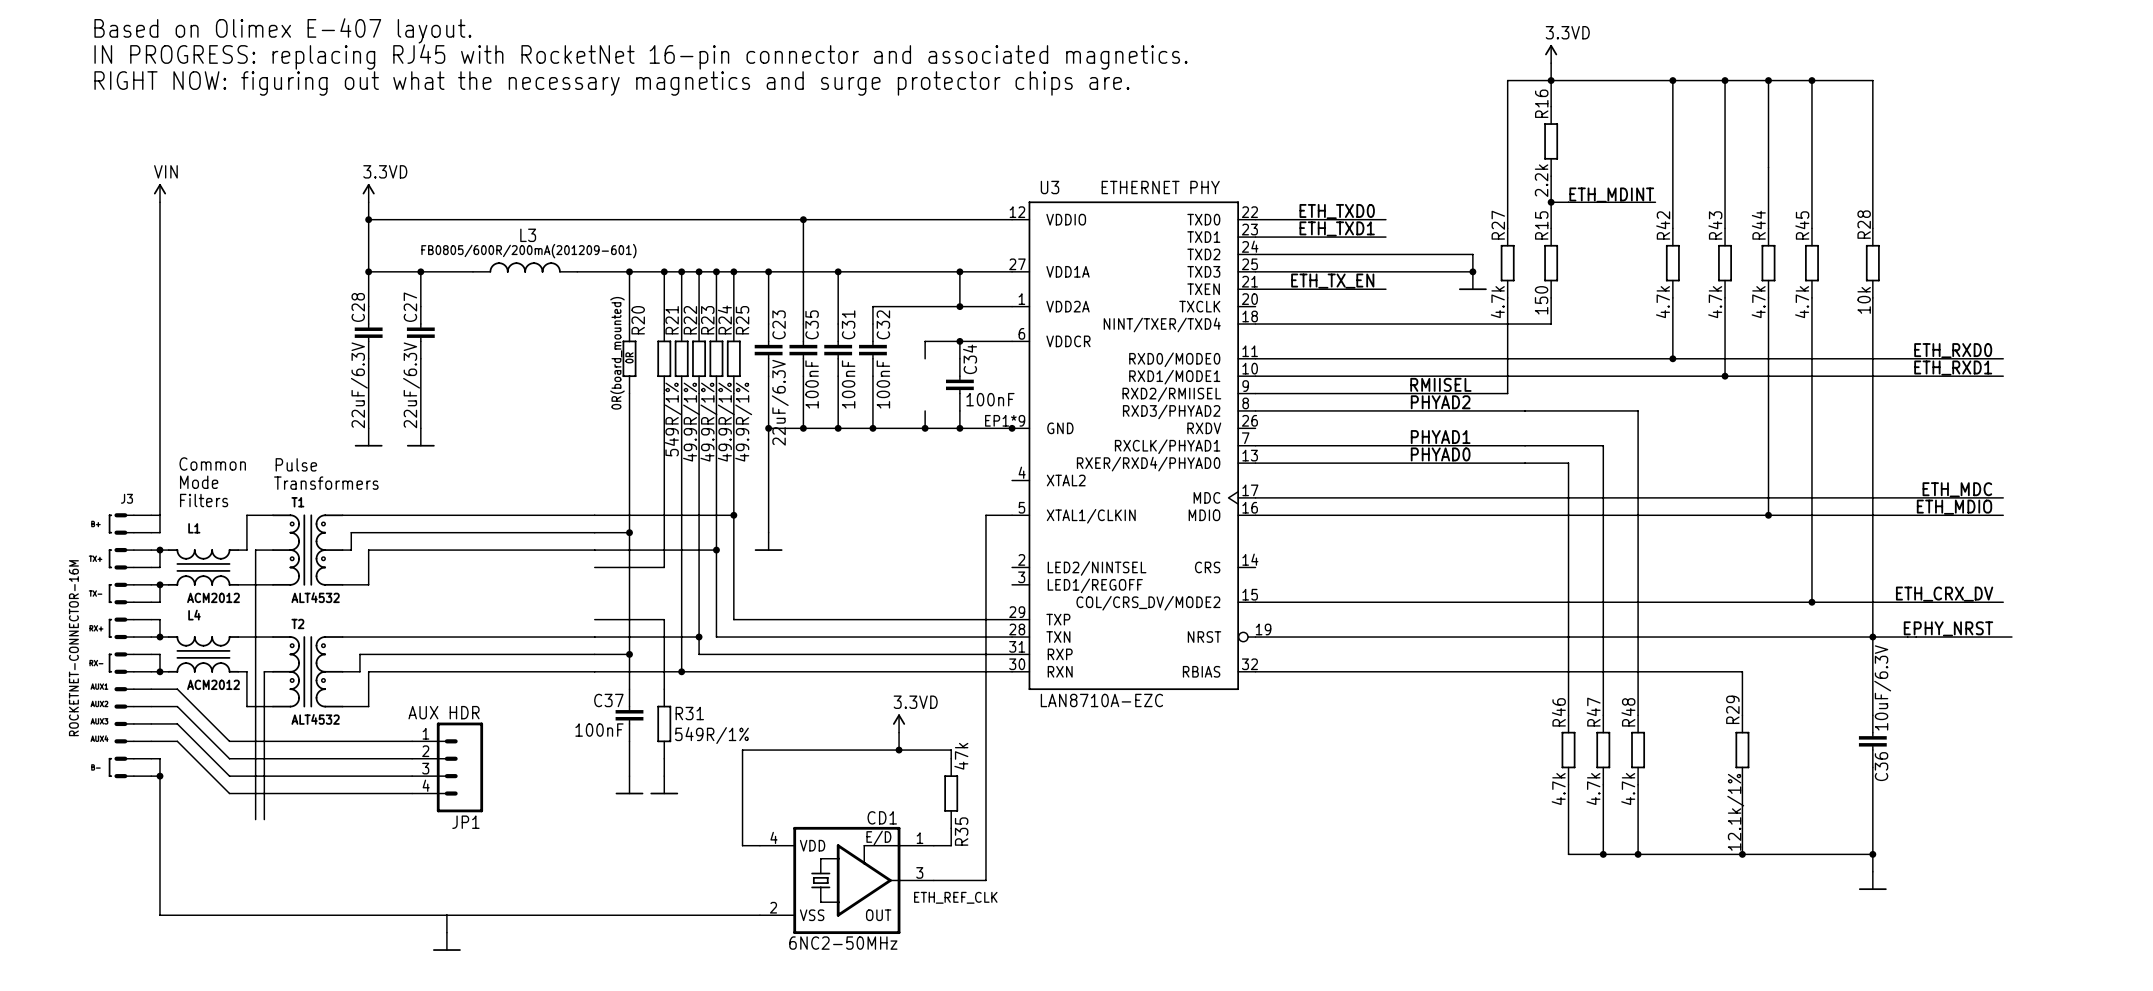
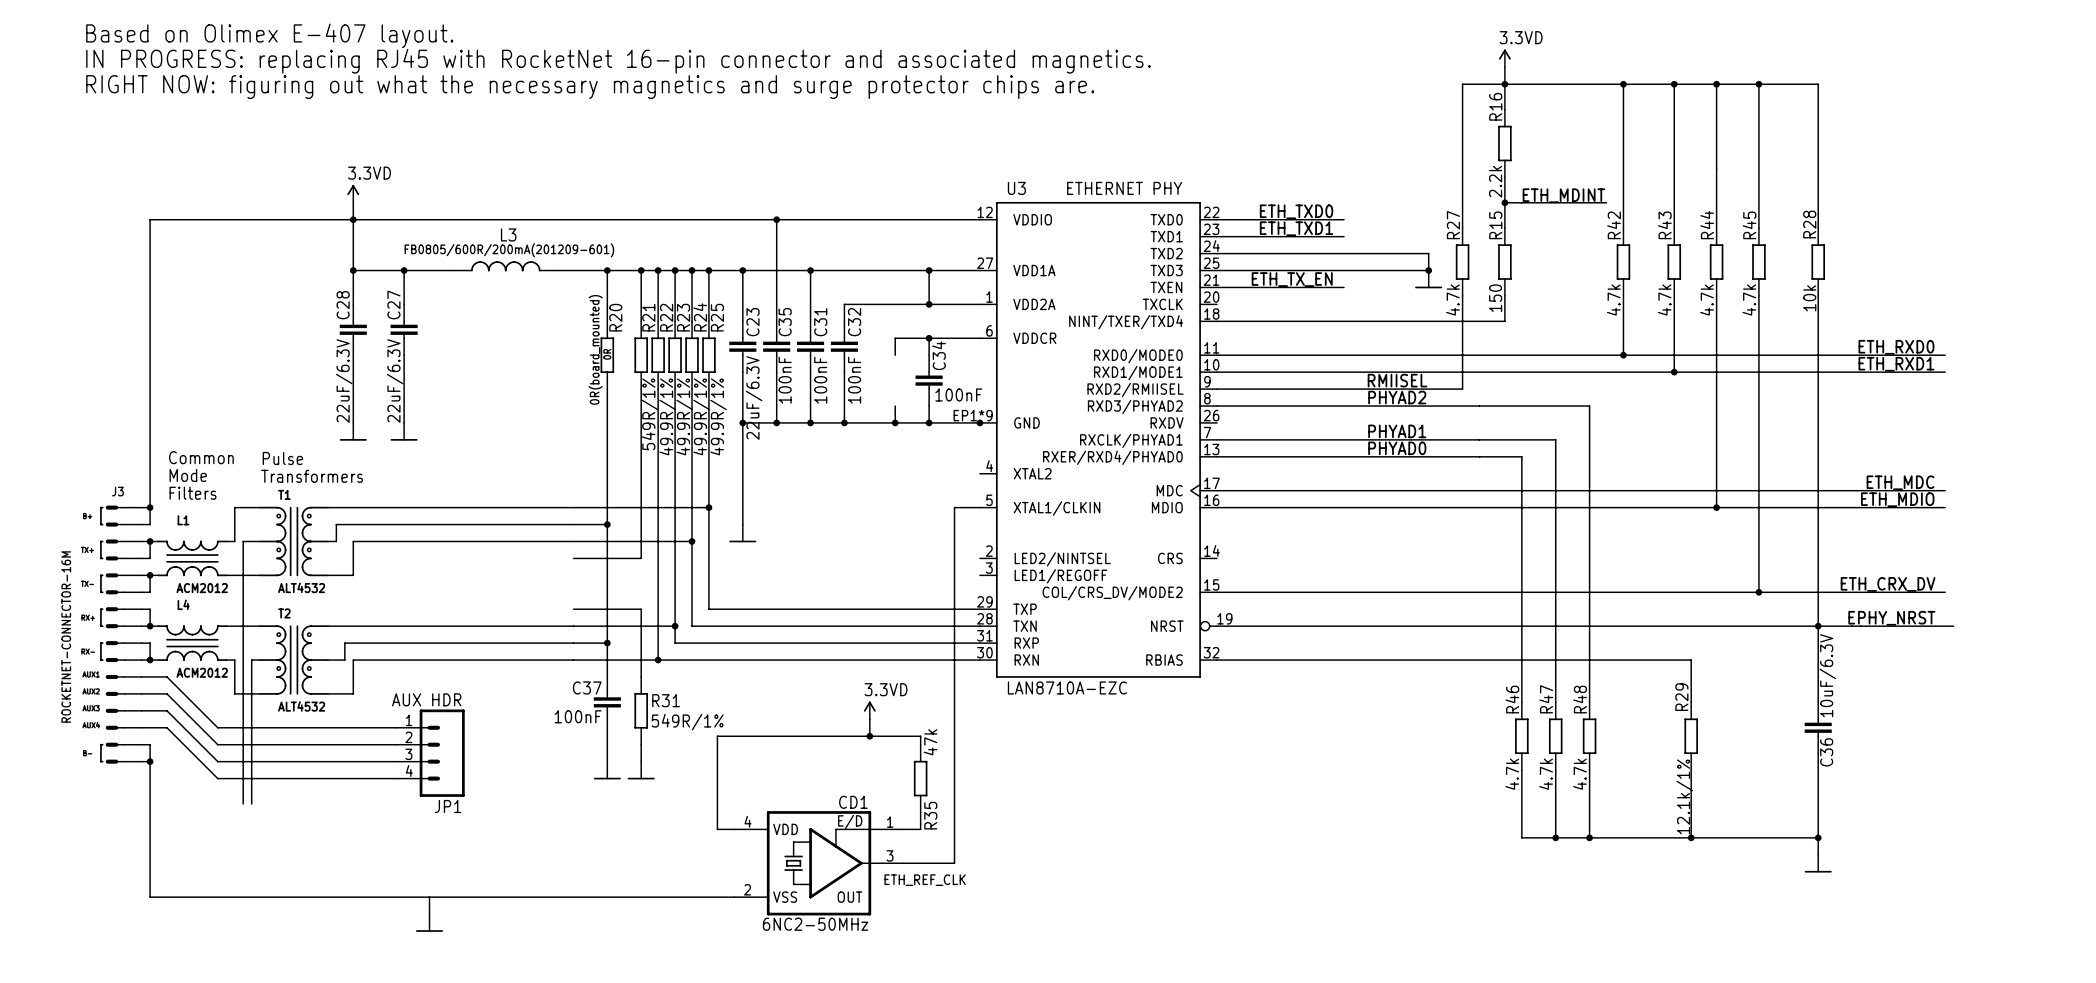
power symbol: VIN (159, 193) -> none
wire: (159, 202) (159, 219) -> (353, 219) (150, 219)
junction: none -> (150, 507)

